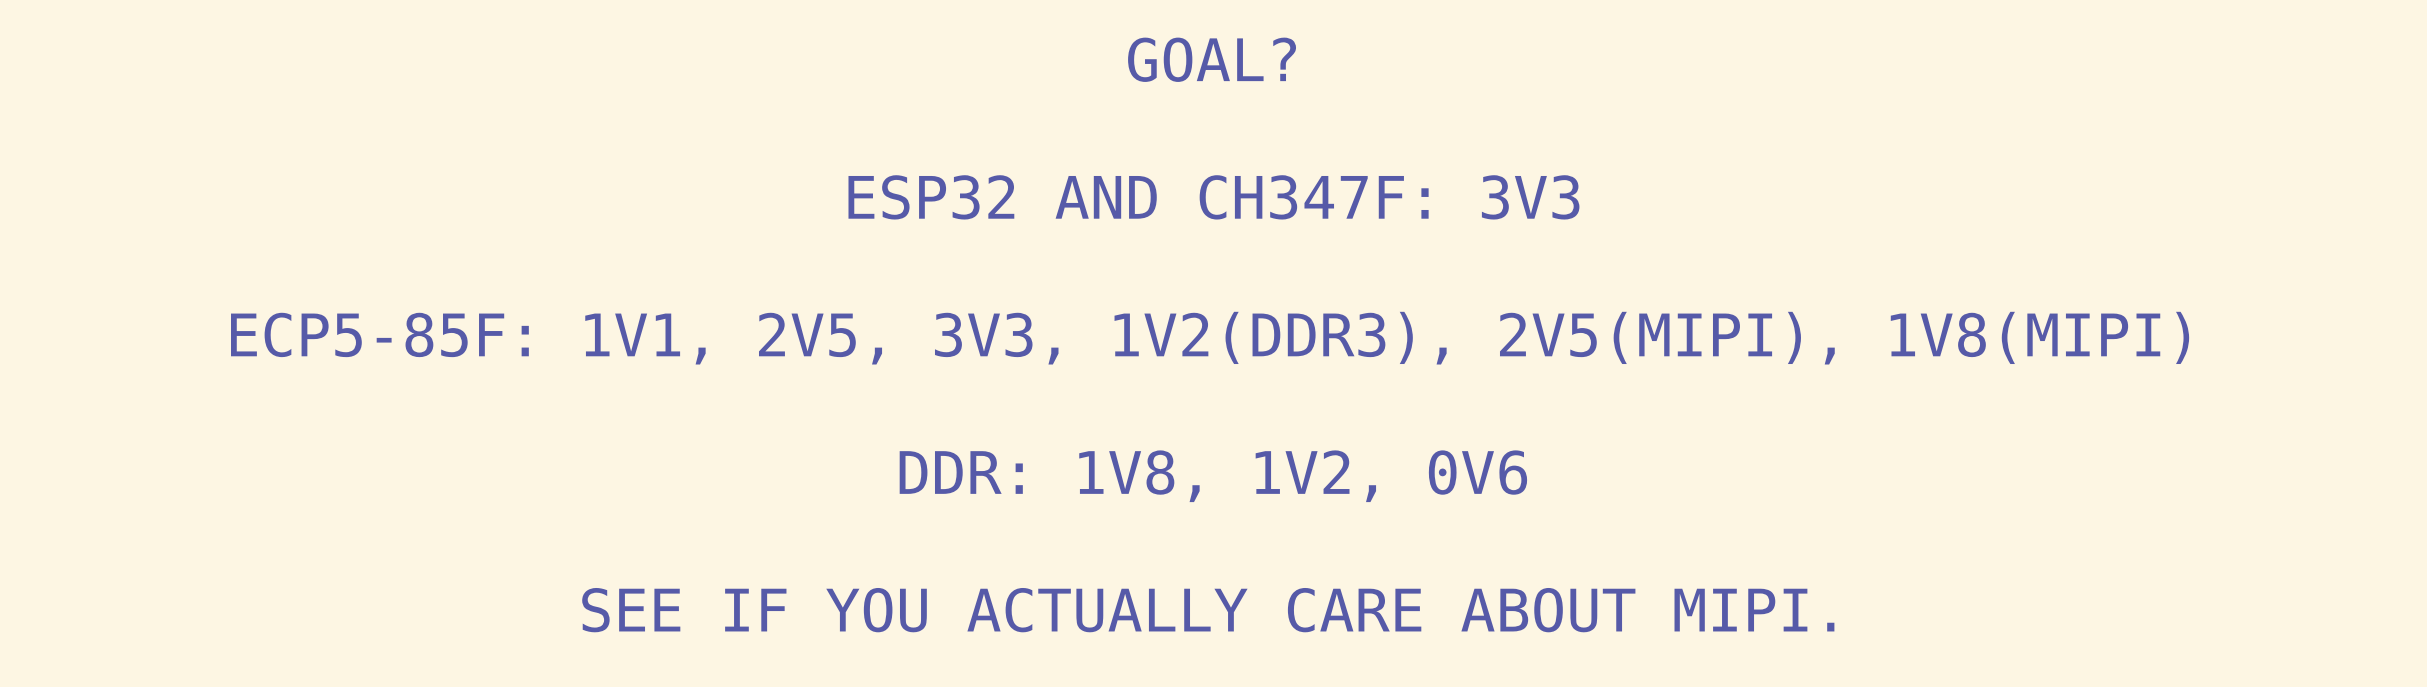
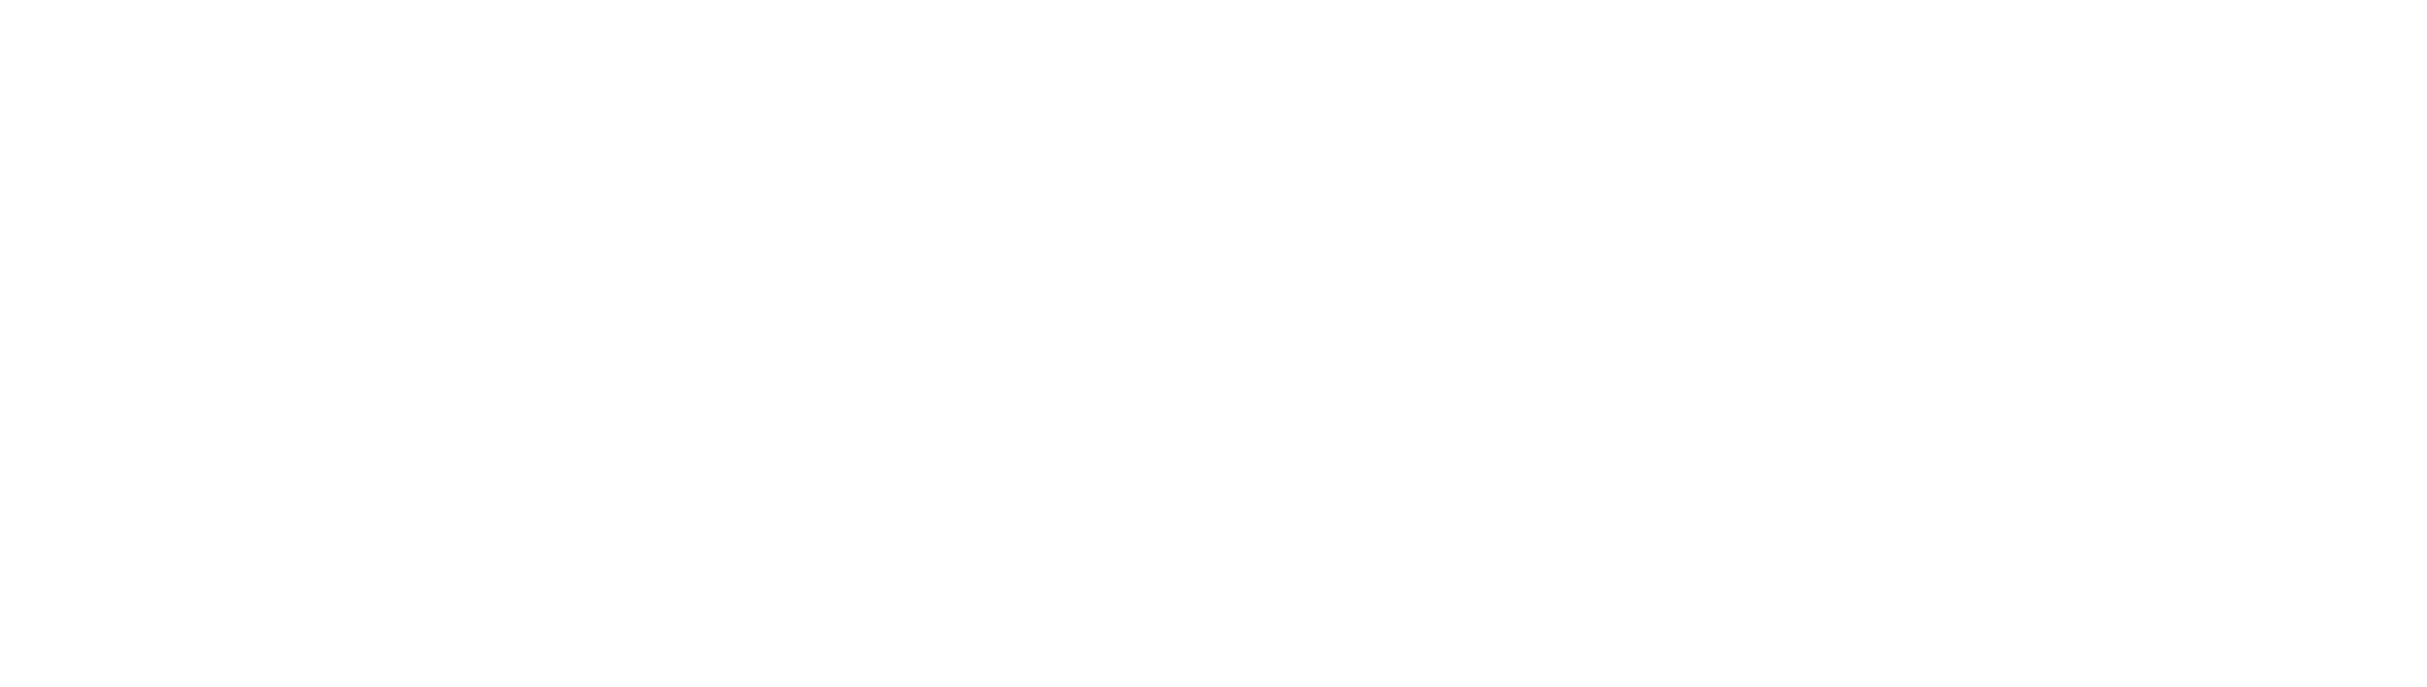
text: GOAL? (1212, 59) -> none
text: ESP32 AND CH347F: 3V3 (1213, 197) -> none
text: ECP5-85F: 1V1, 2V5, 3V3, 1V2(DDR3), 2V5(MIPI), 1V8(MIPI) (1210, 338) -> none
text: DDR: 1V8, 1V2, 0V6 (1213, 476) -> none
text: SEE IF YOU ACTUALLY CARE ABOUT MIPI. (1208, 610) -> none

